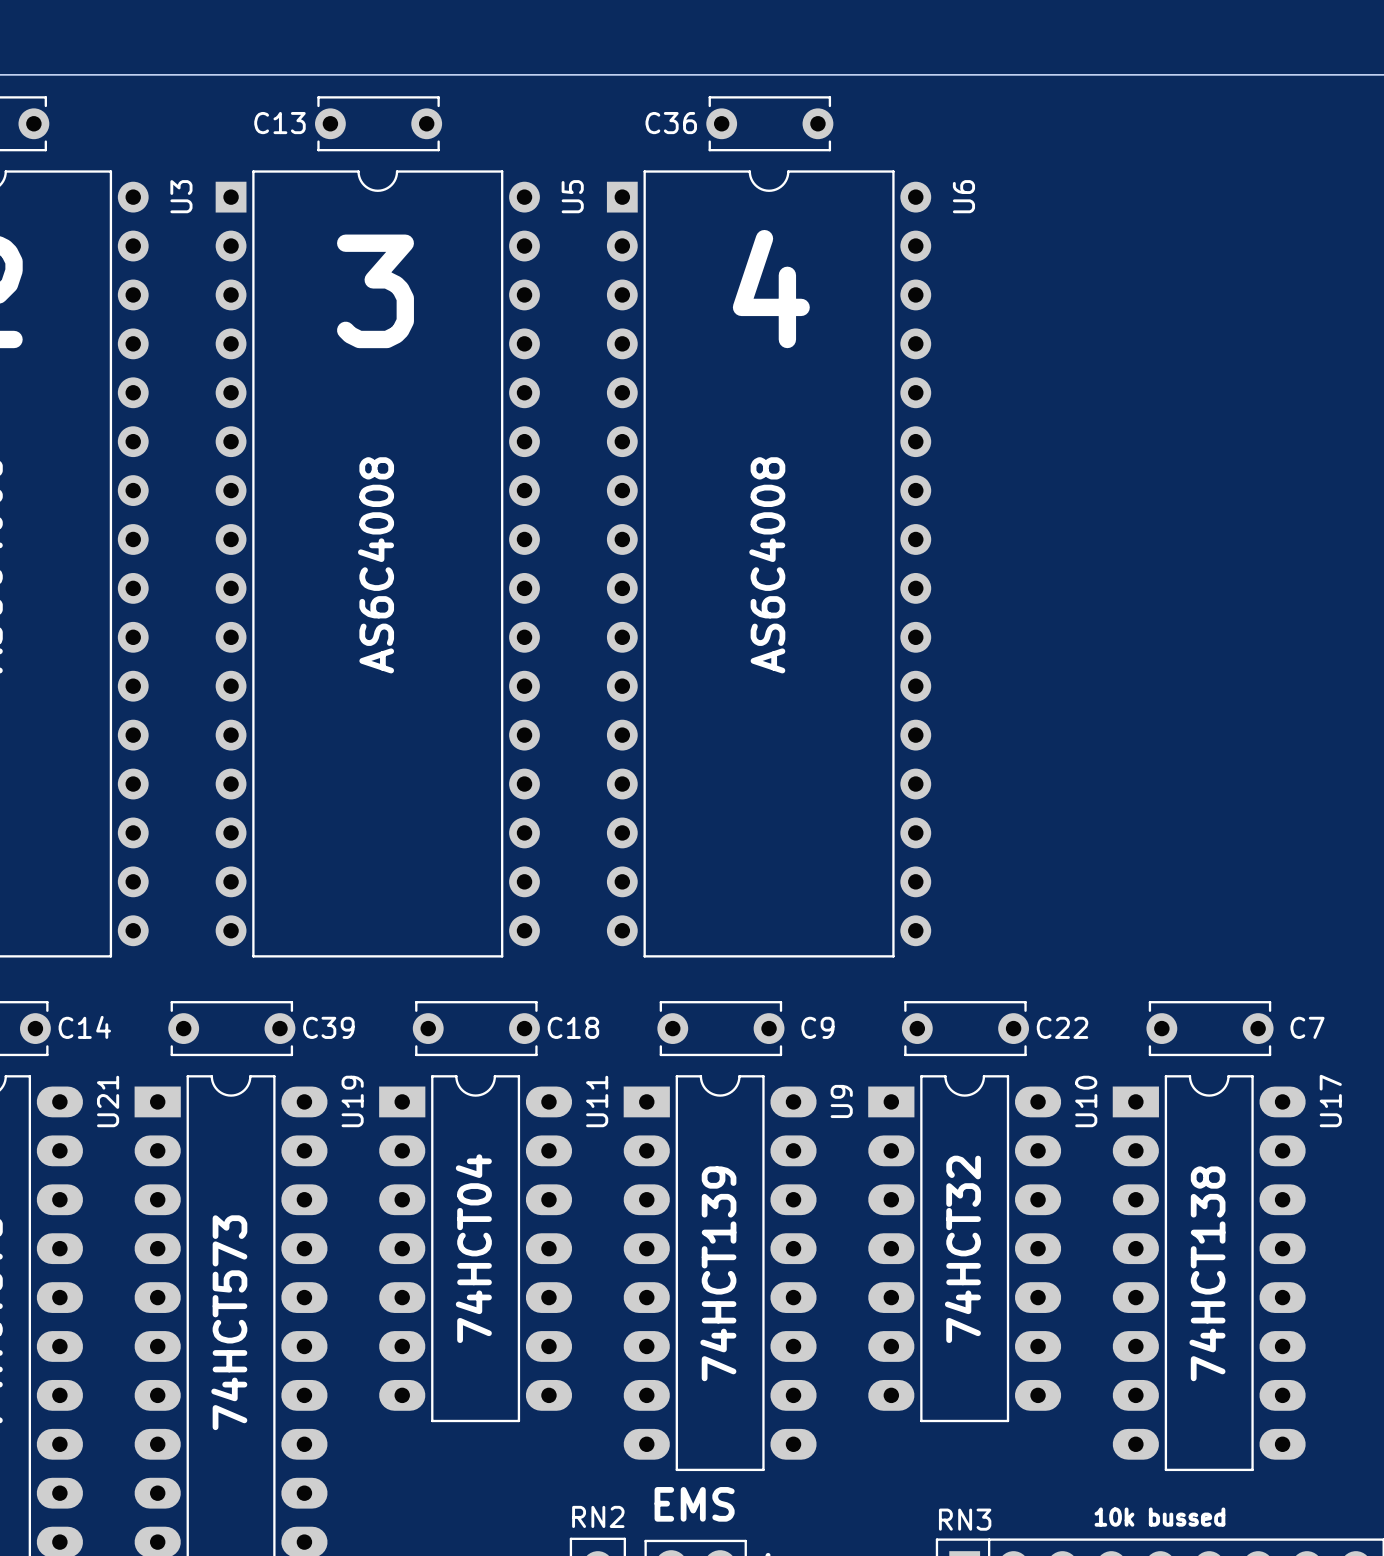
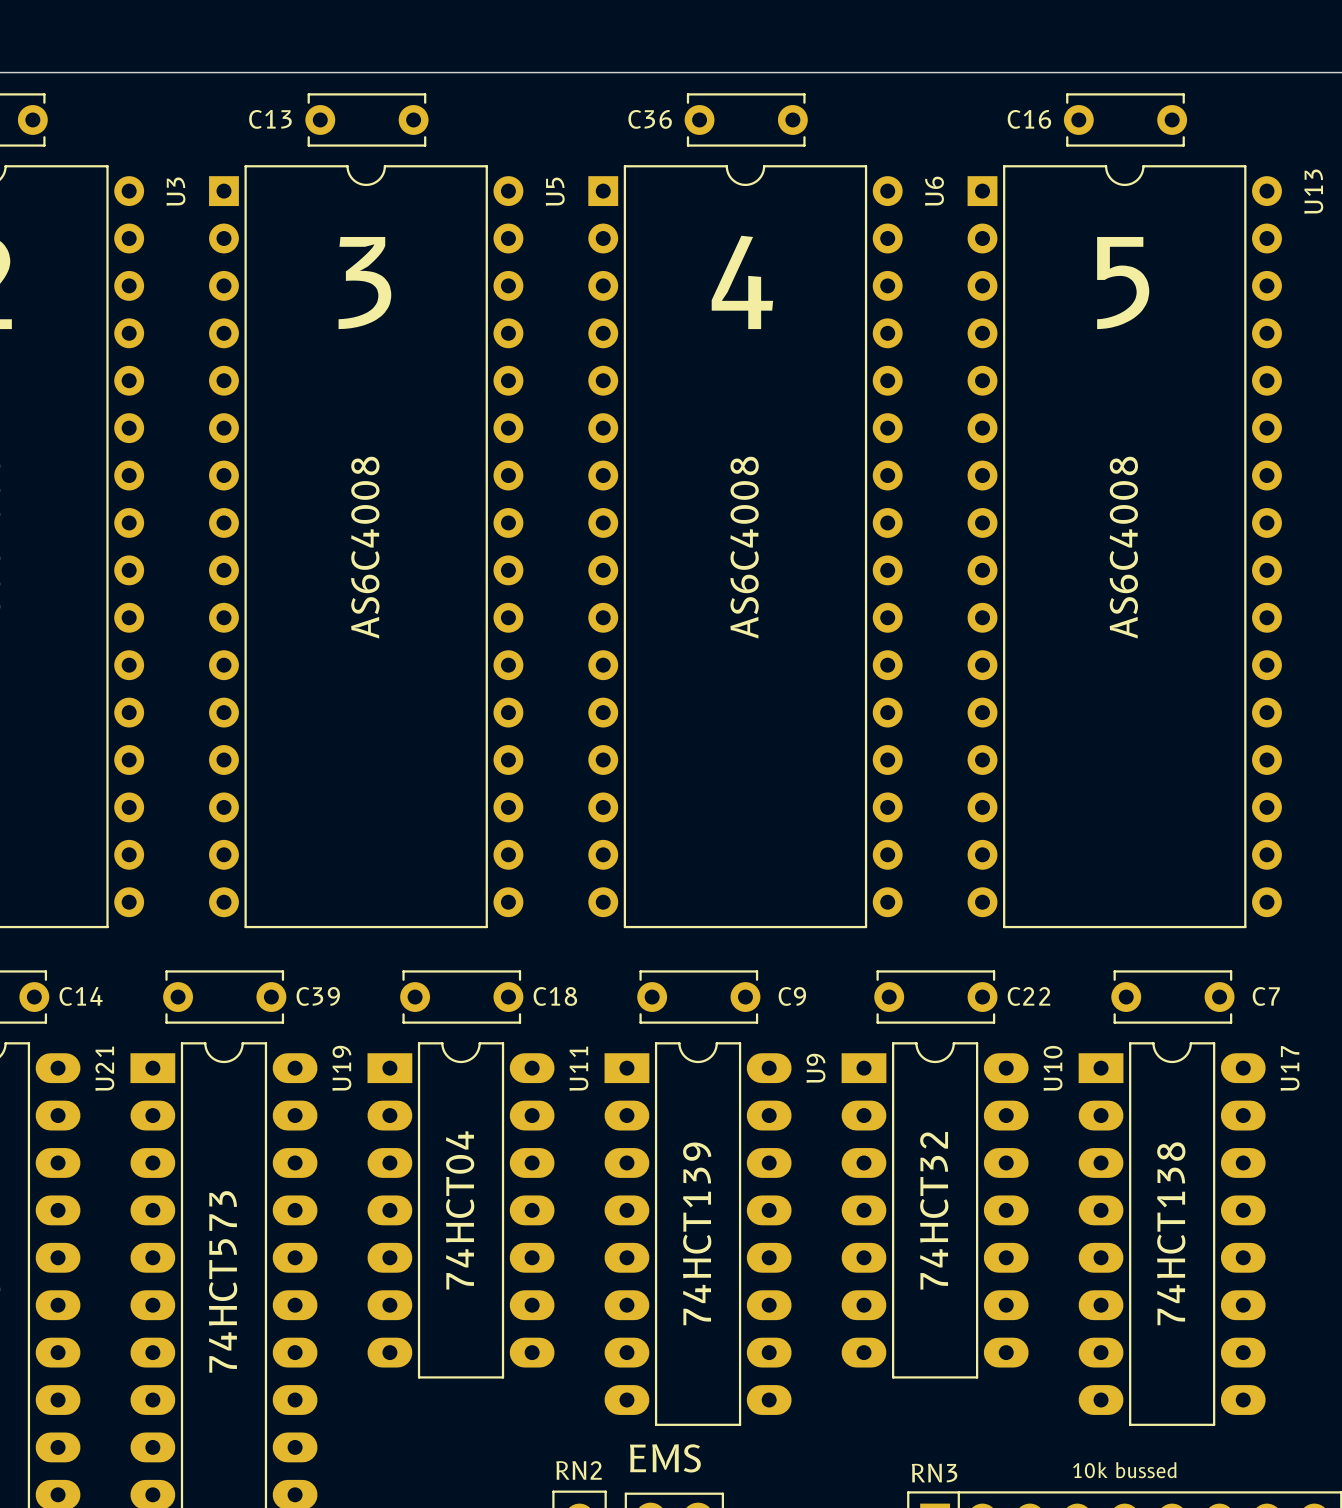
C16: none -> (1125, 119)
text: none -> 5 (1123, 283)
U13: none -> (1124, 546)
text: none -> AS6C4008 (1123, 547)

